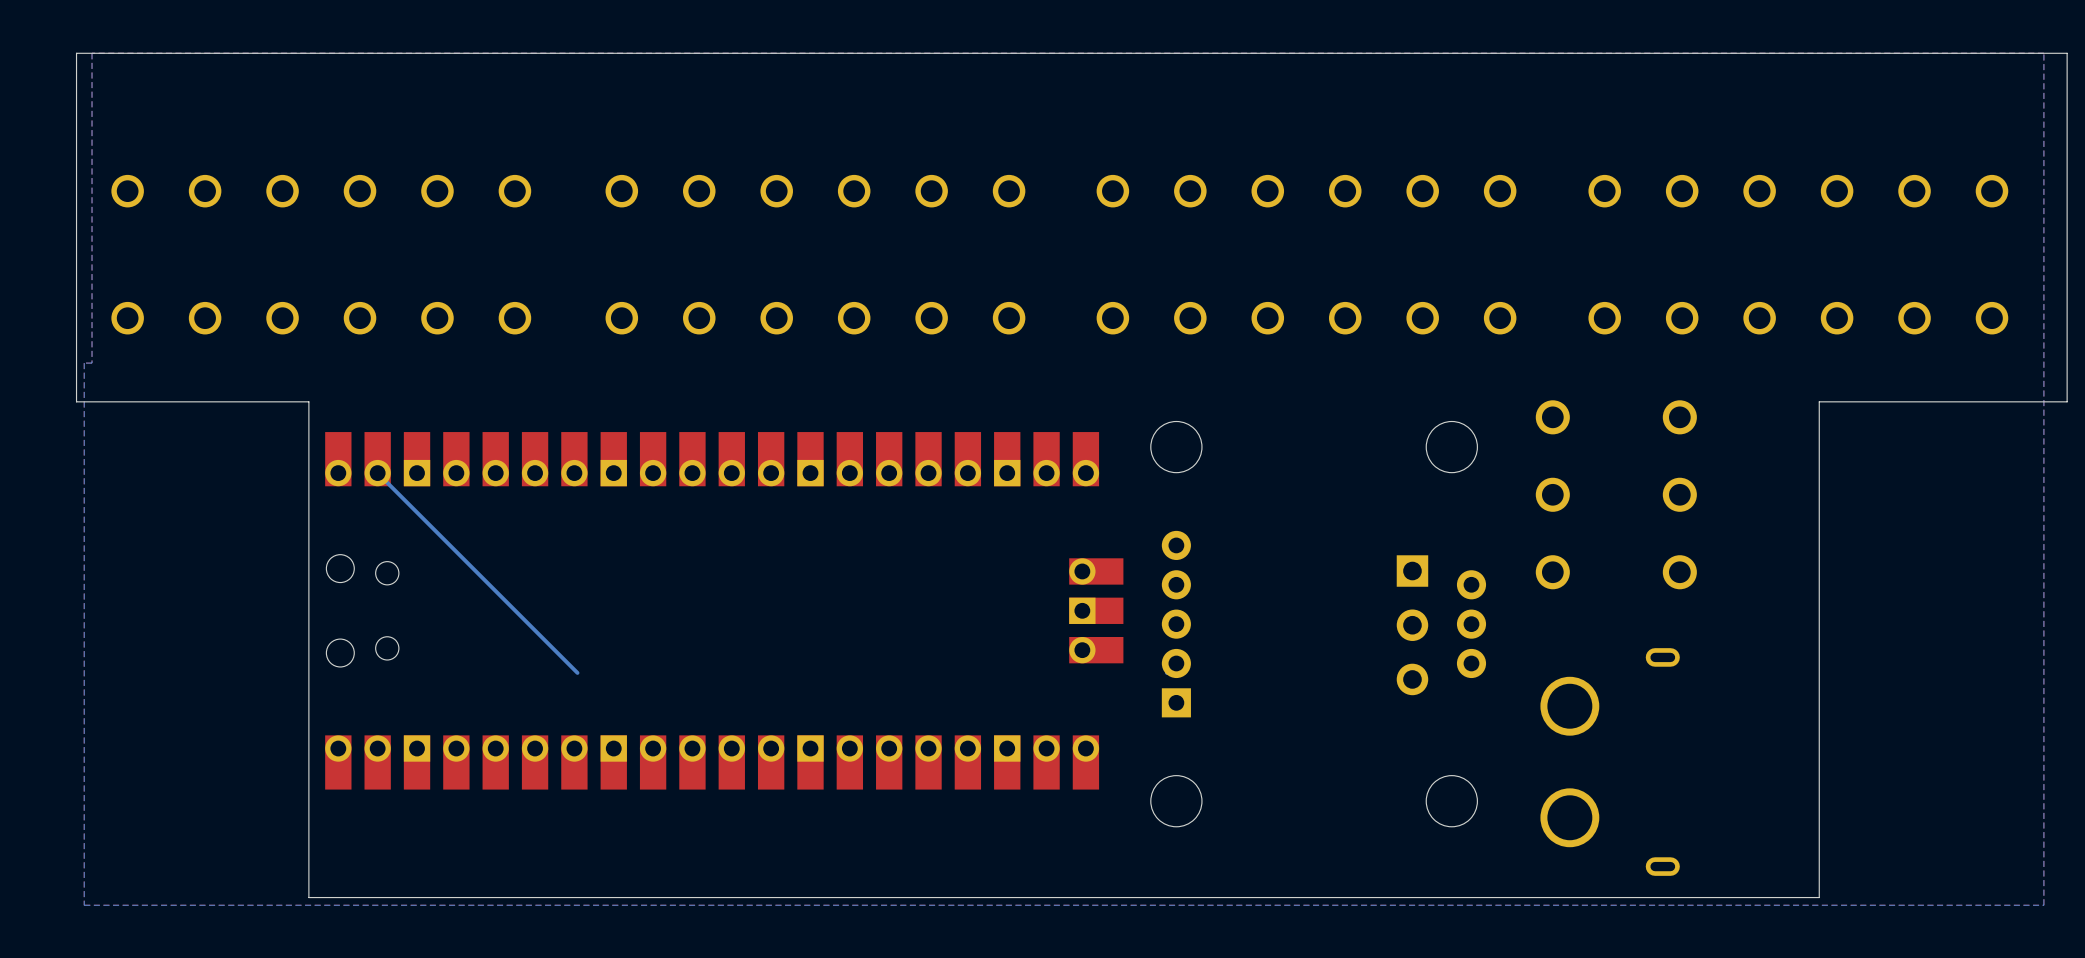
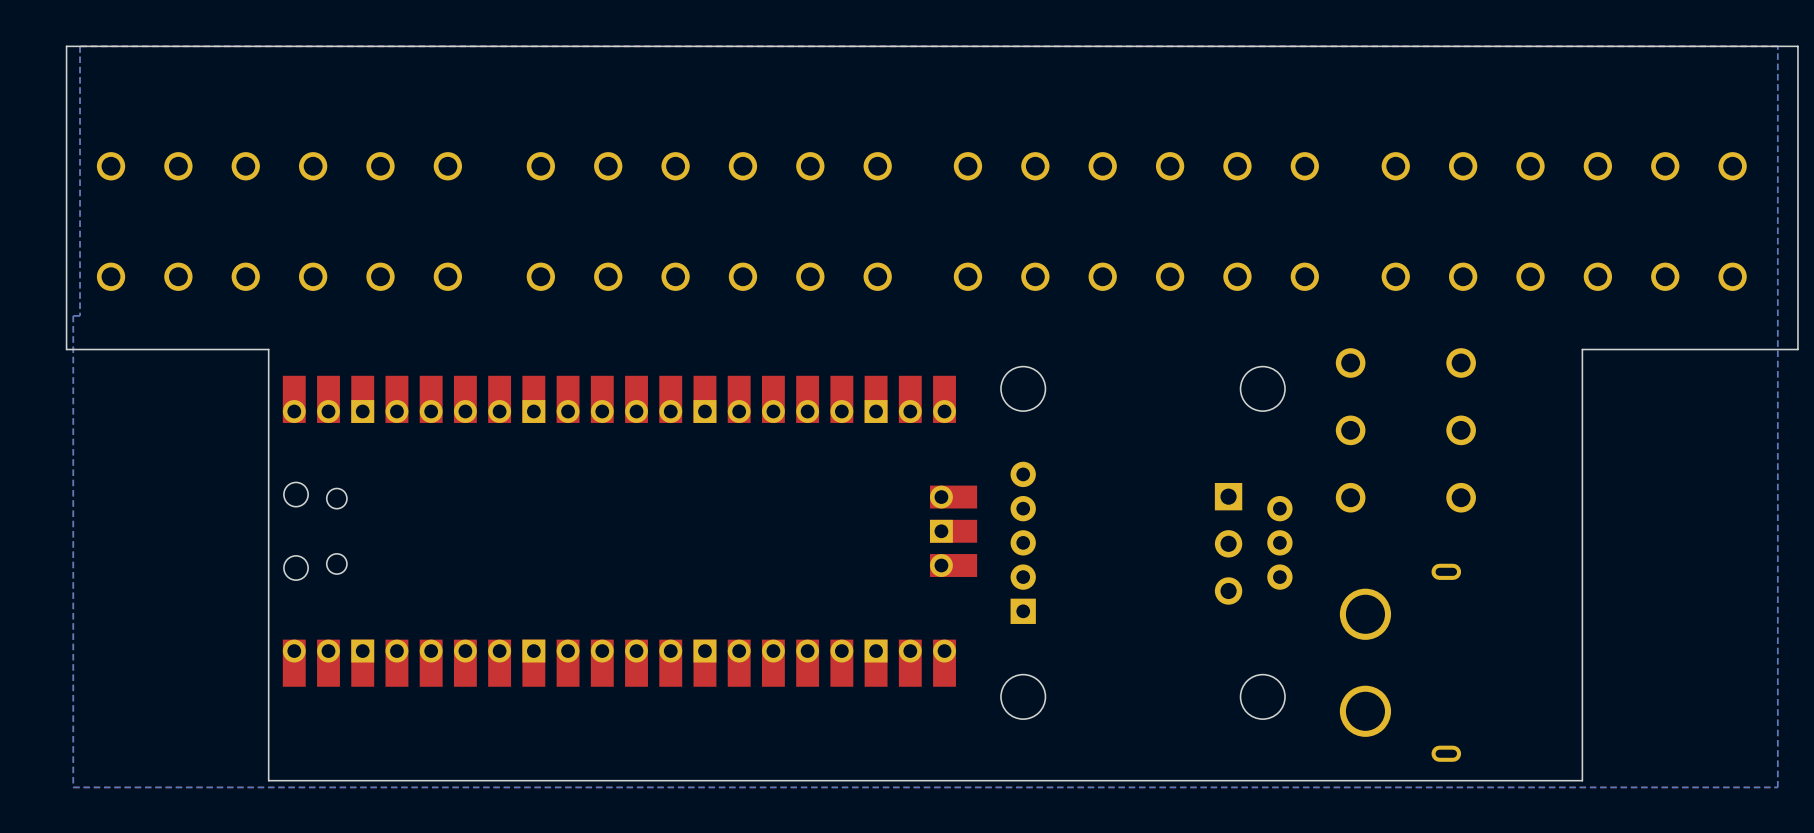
bottom track: (377, 473) (577, 672) -> none

